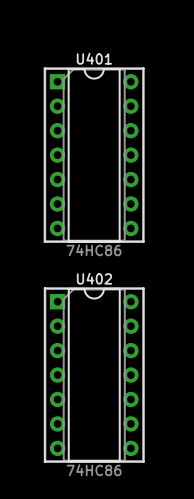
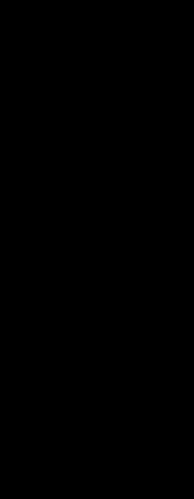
U401: 74HC86 (94, 155) -> none
U402: 74HC86 (94, 375) -> none

